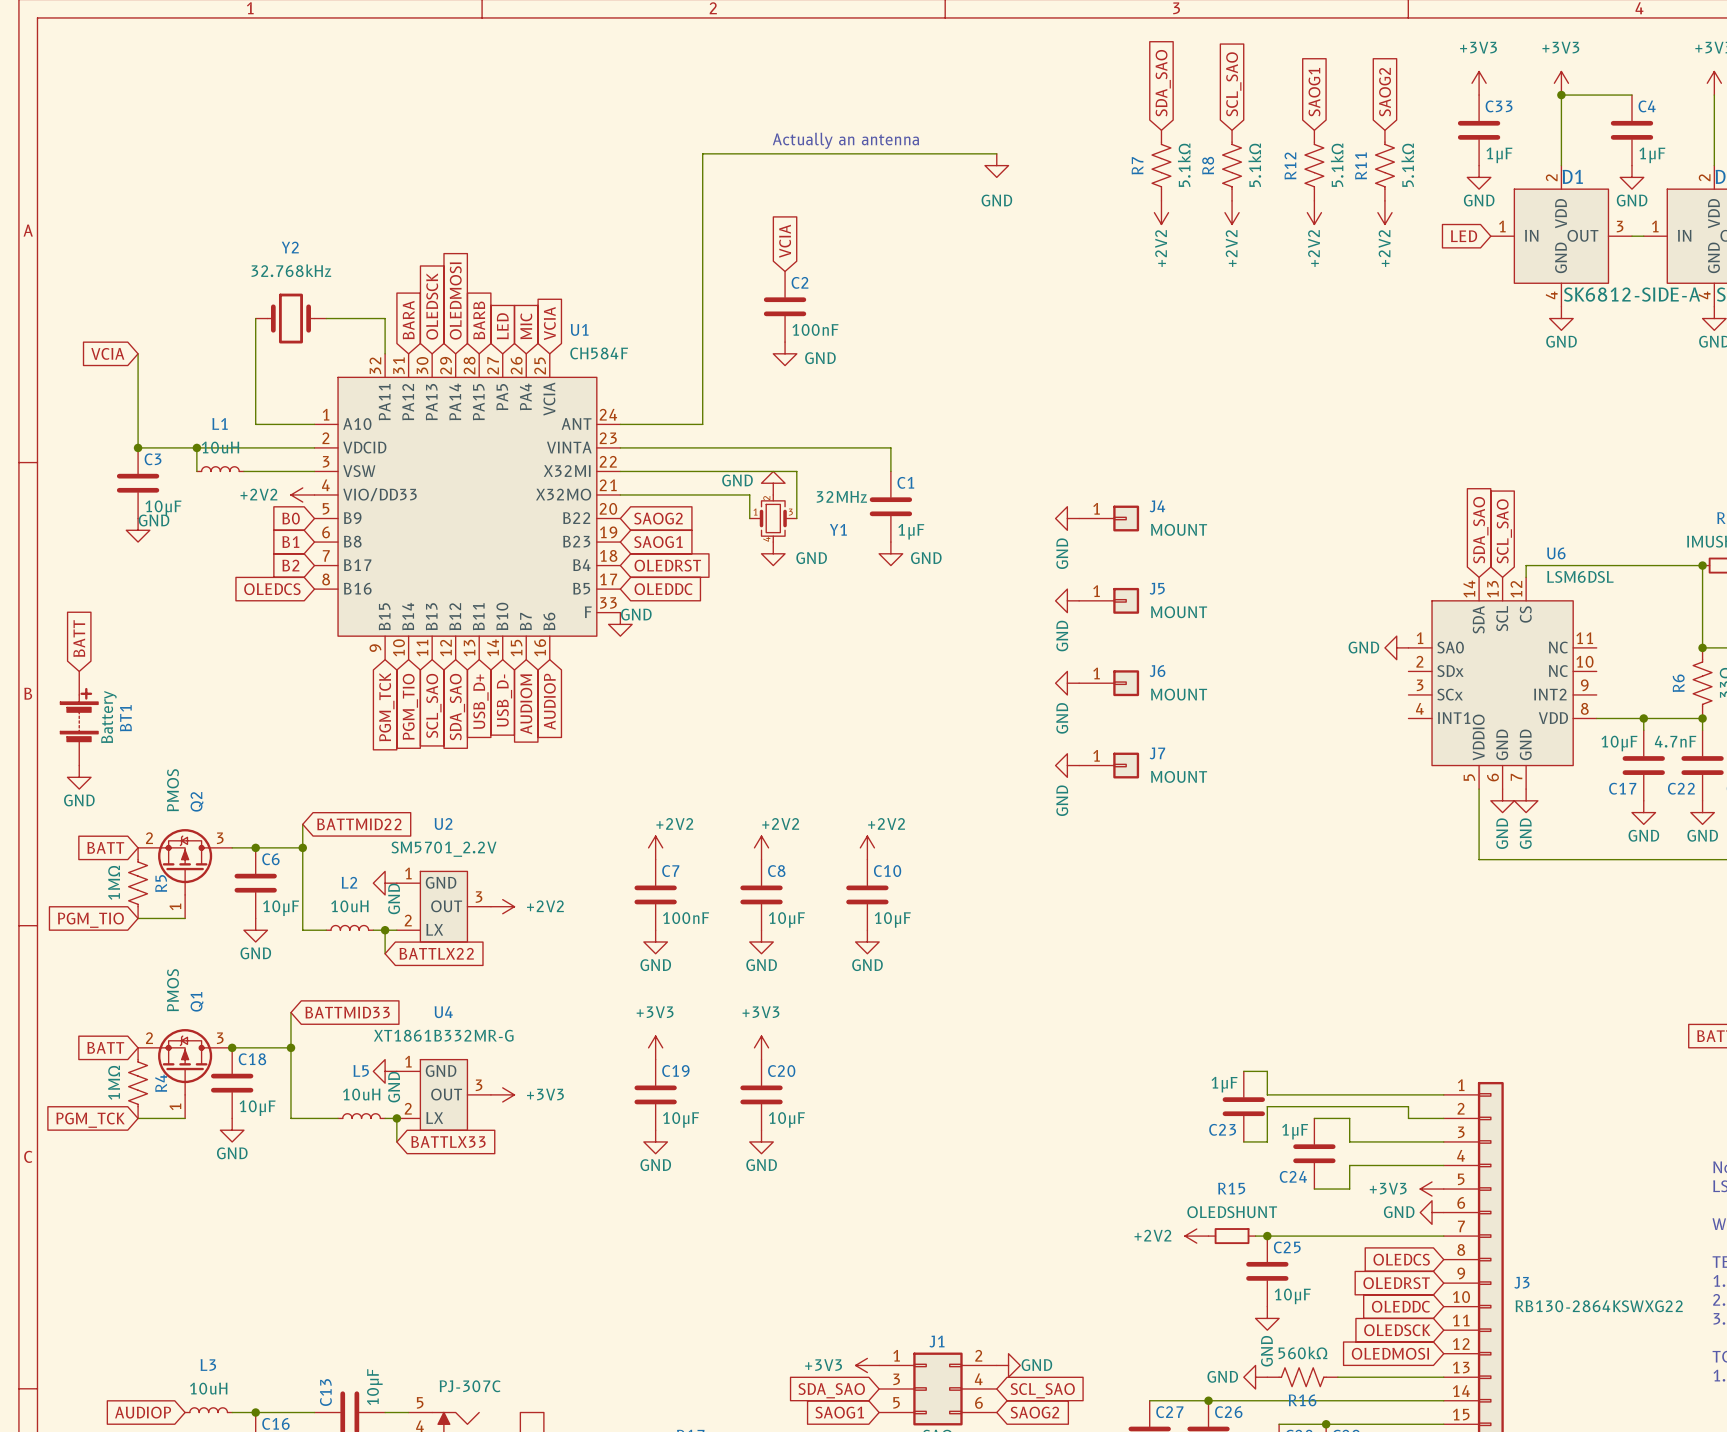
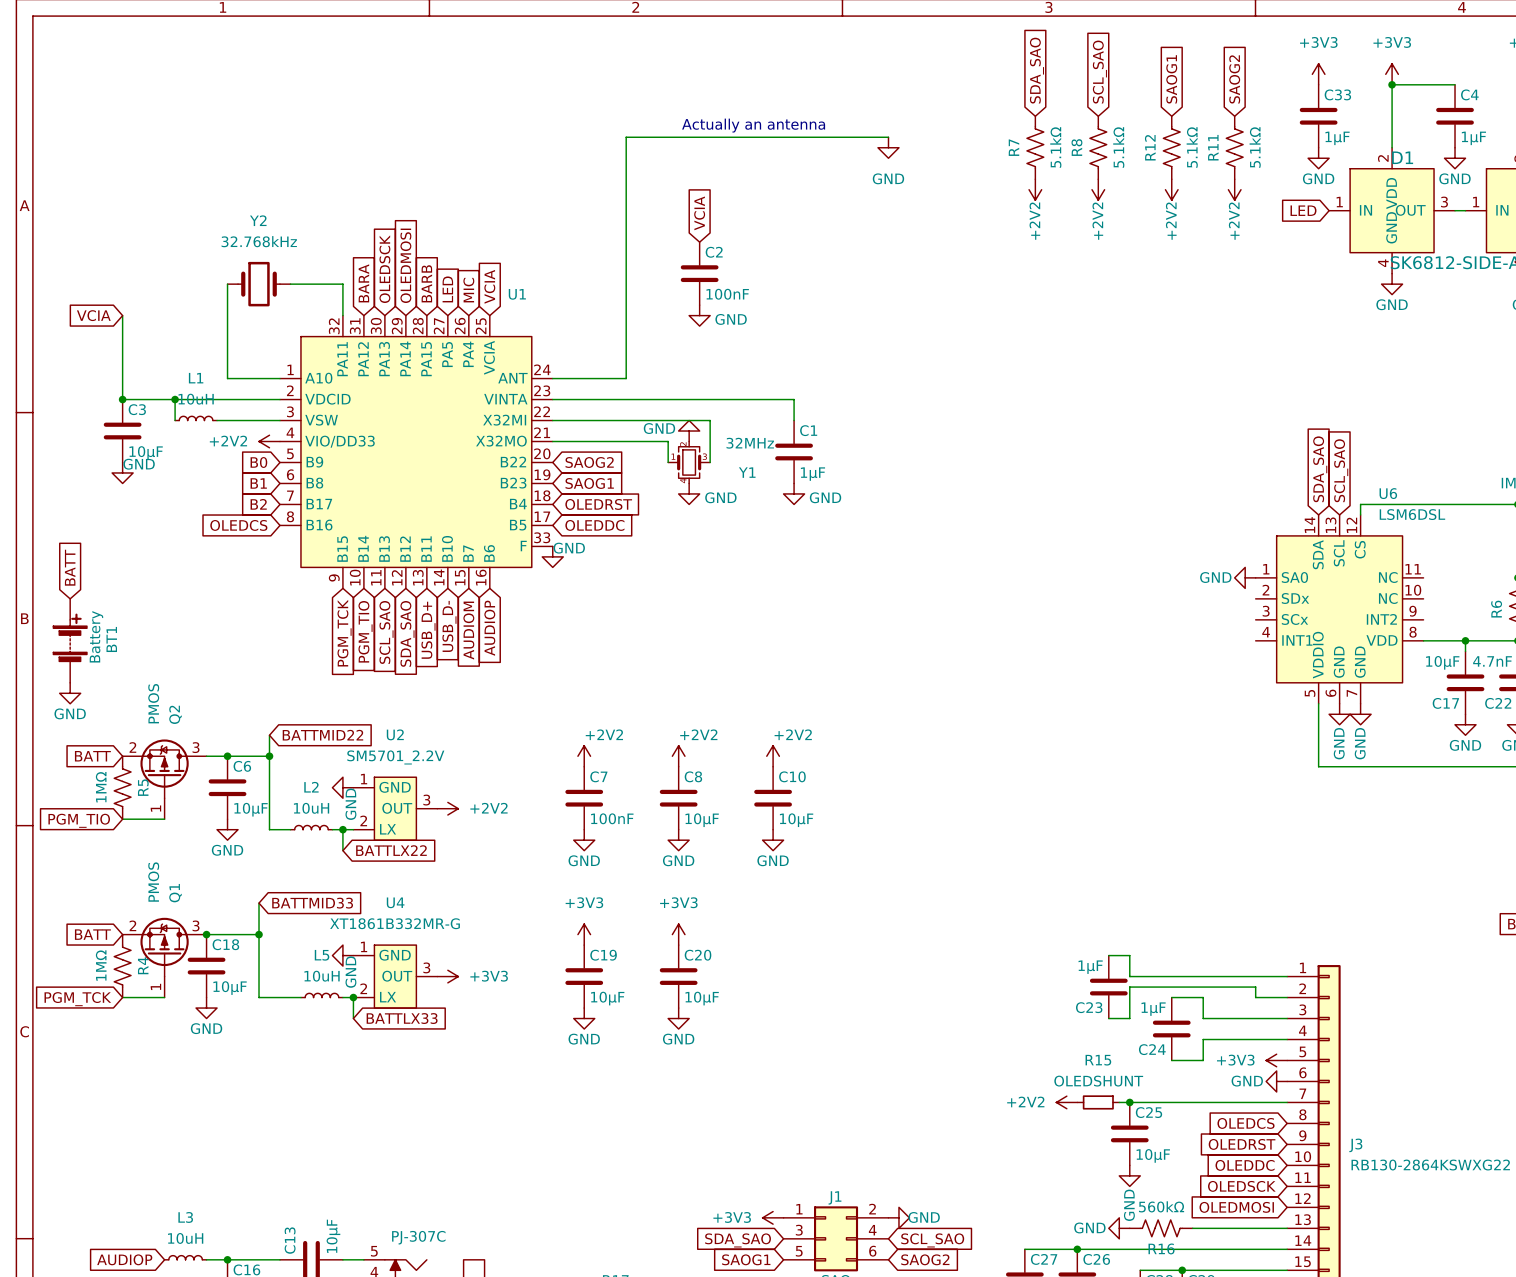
U1 value: CH584F (599, 353) -> none
power symbol: GND (1067, 518) -> none
J4: MOUNT (1109, 518) -> none
power symbol: GND (1067, 600) -> none
J5: MOUNT (1109, 600) -> none
power symbol: GND (1067, 683) -> none
J6: MOUNT (1109, 683) -> none
power symbol: GND (1067, 765) -> none
J7: MOUNT (1109, 765) -> none

